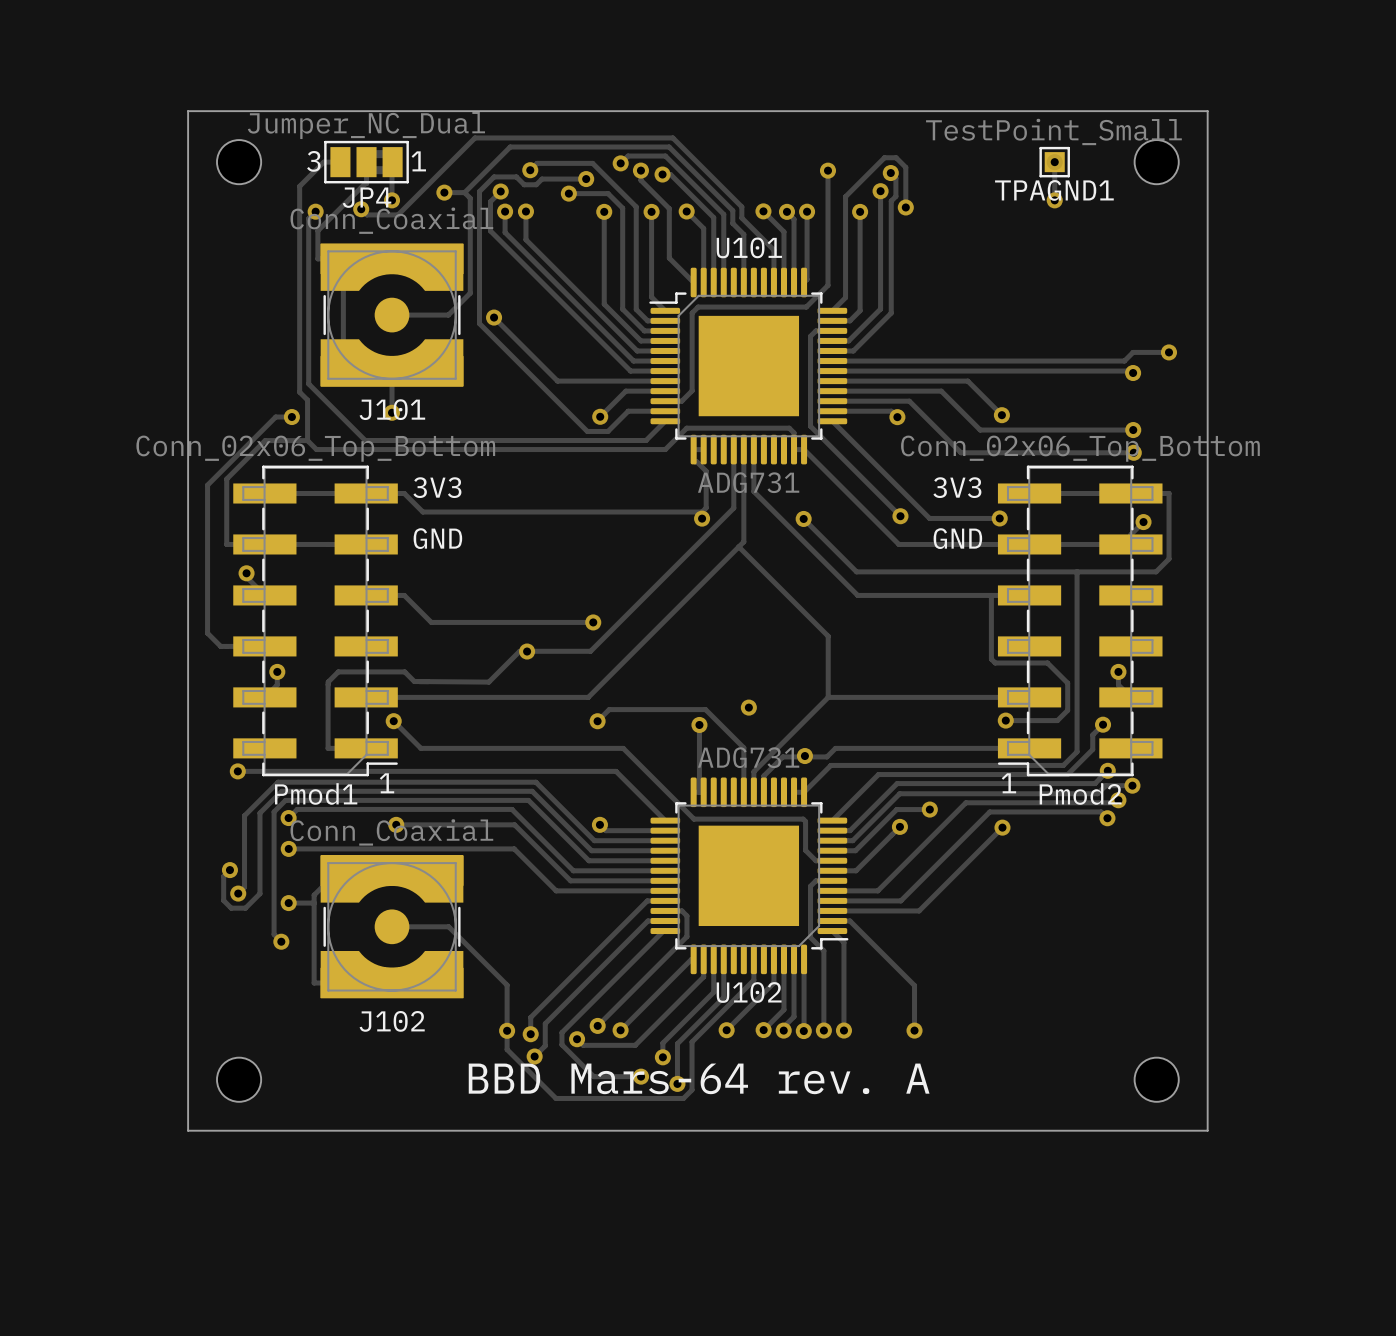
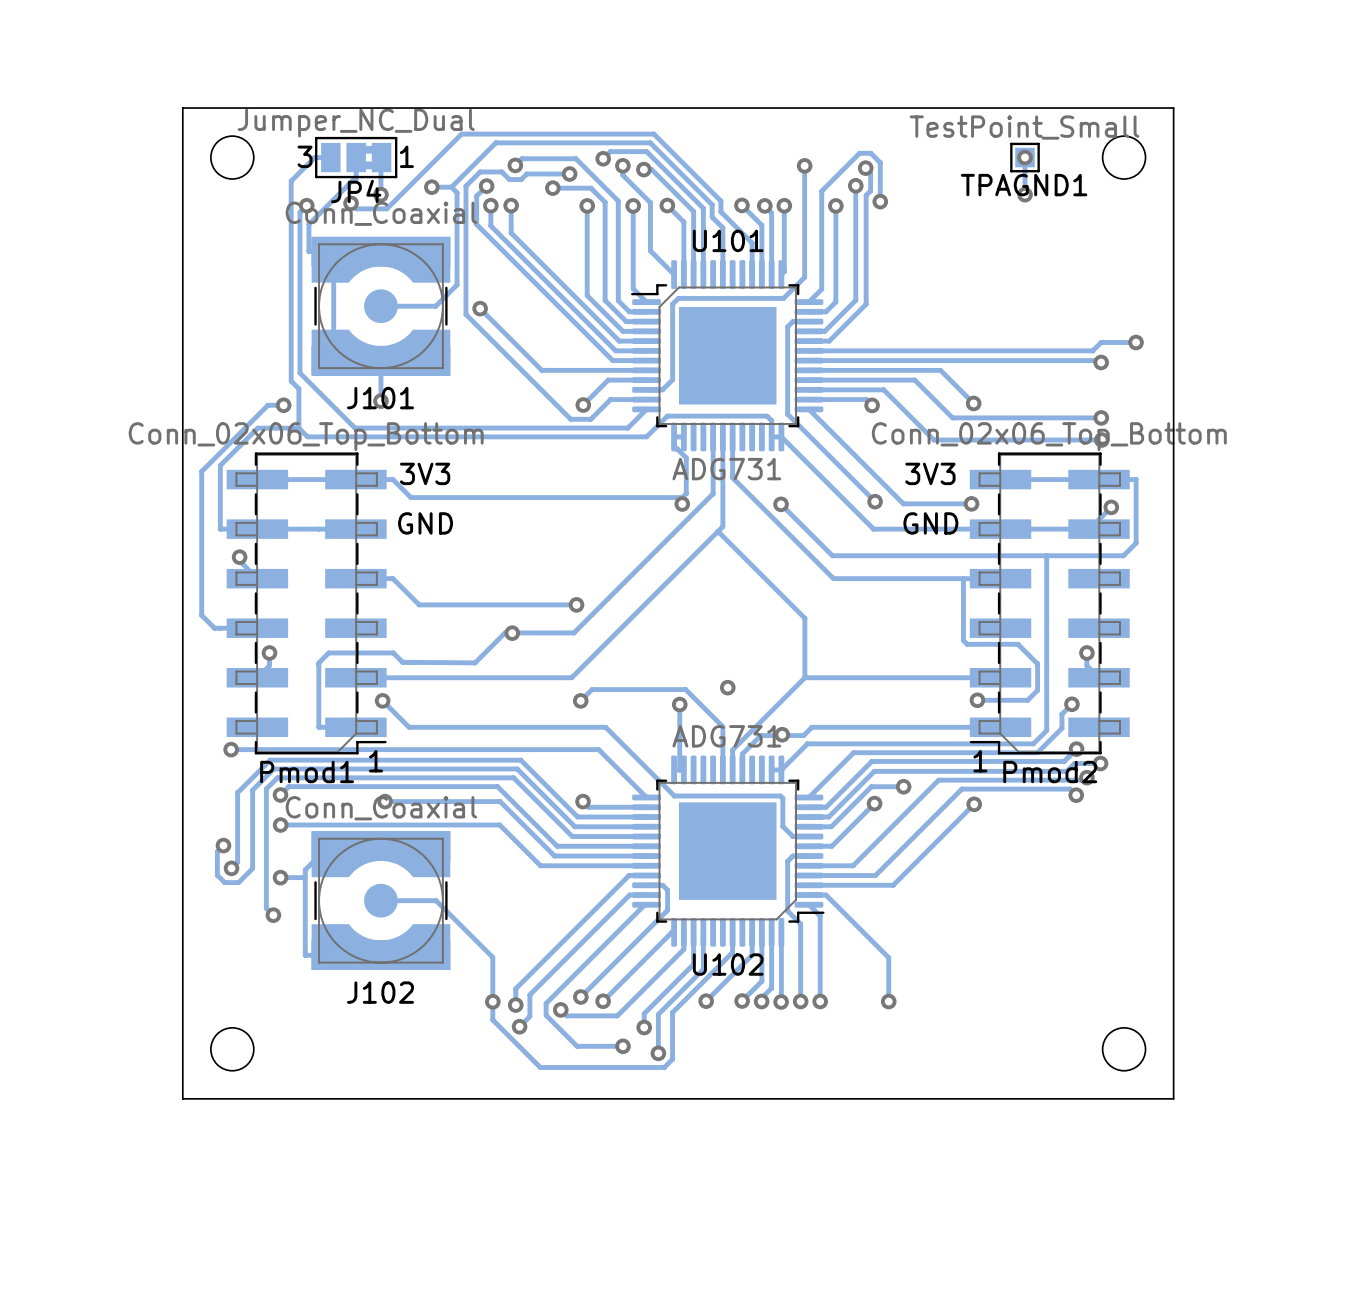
text: BBD Mars-64 rev. A (699, 1078) -> none

